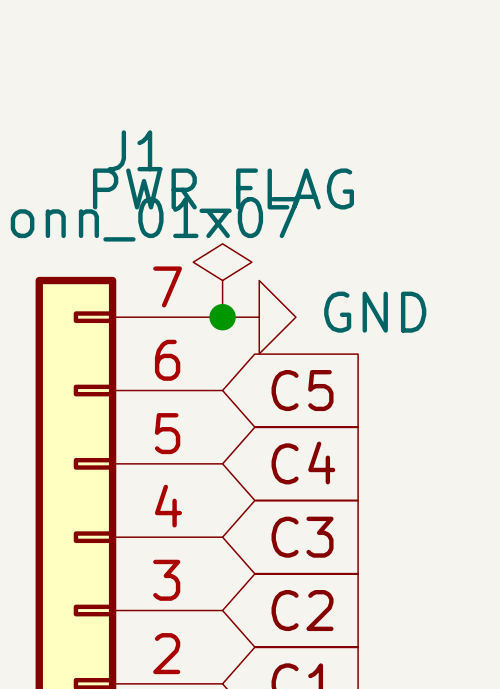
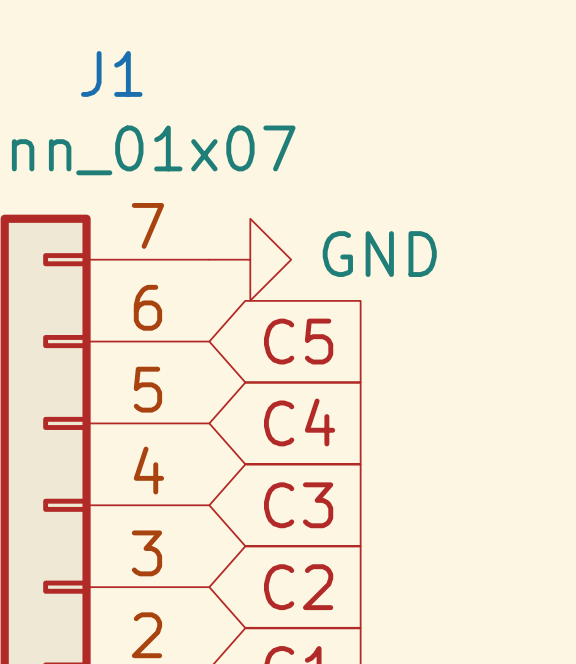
power symbol: PWR_FLAG (222, 280) -> none
junction: (222, 317) -> none

